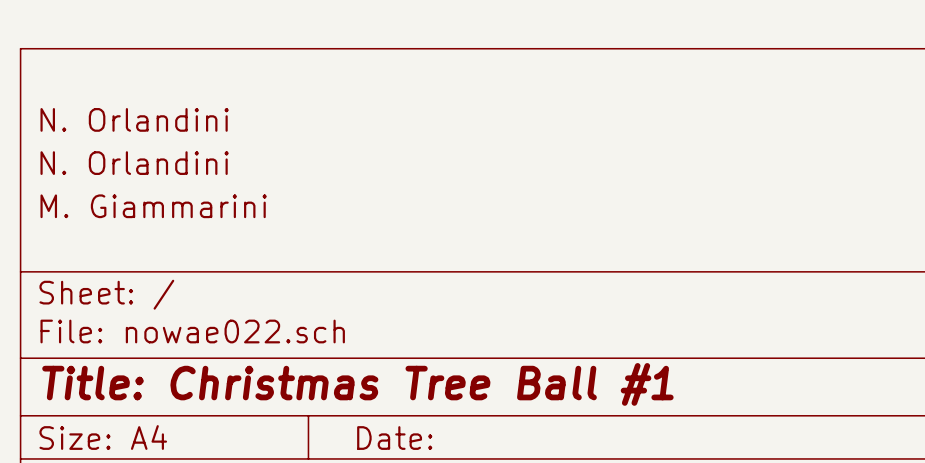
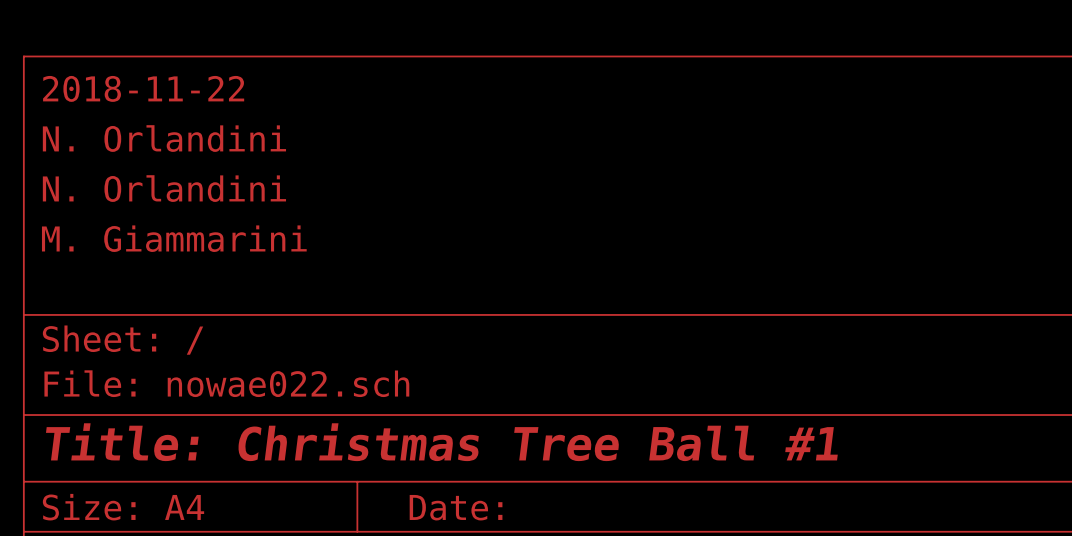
title block: none -> 2018-11-22 (143, 88)

